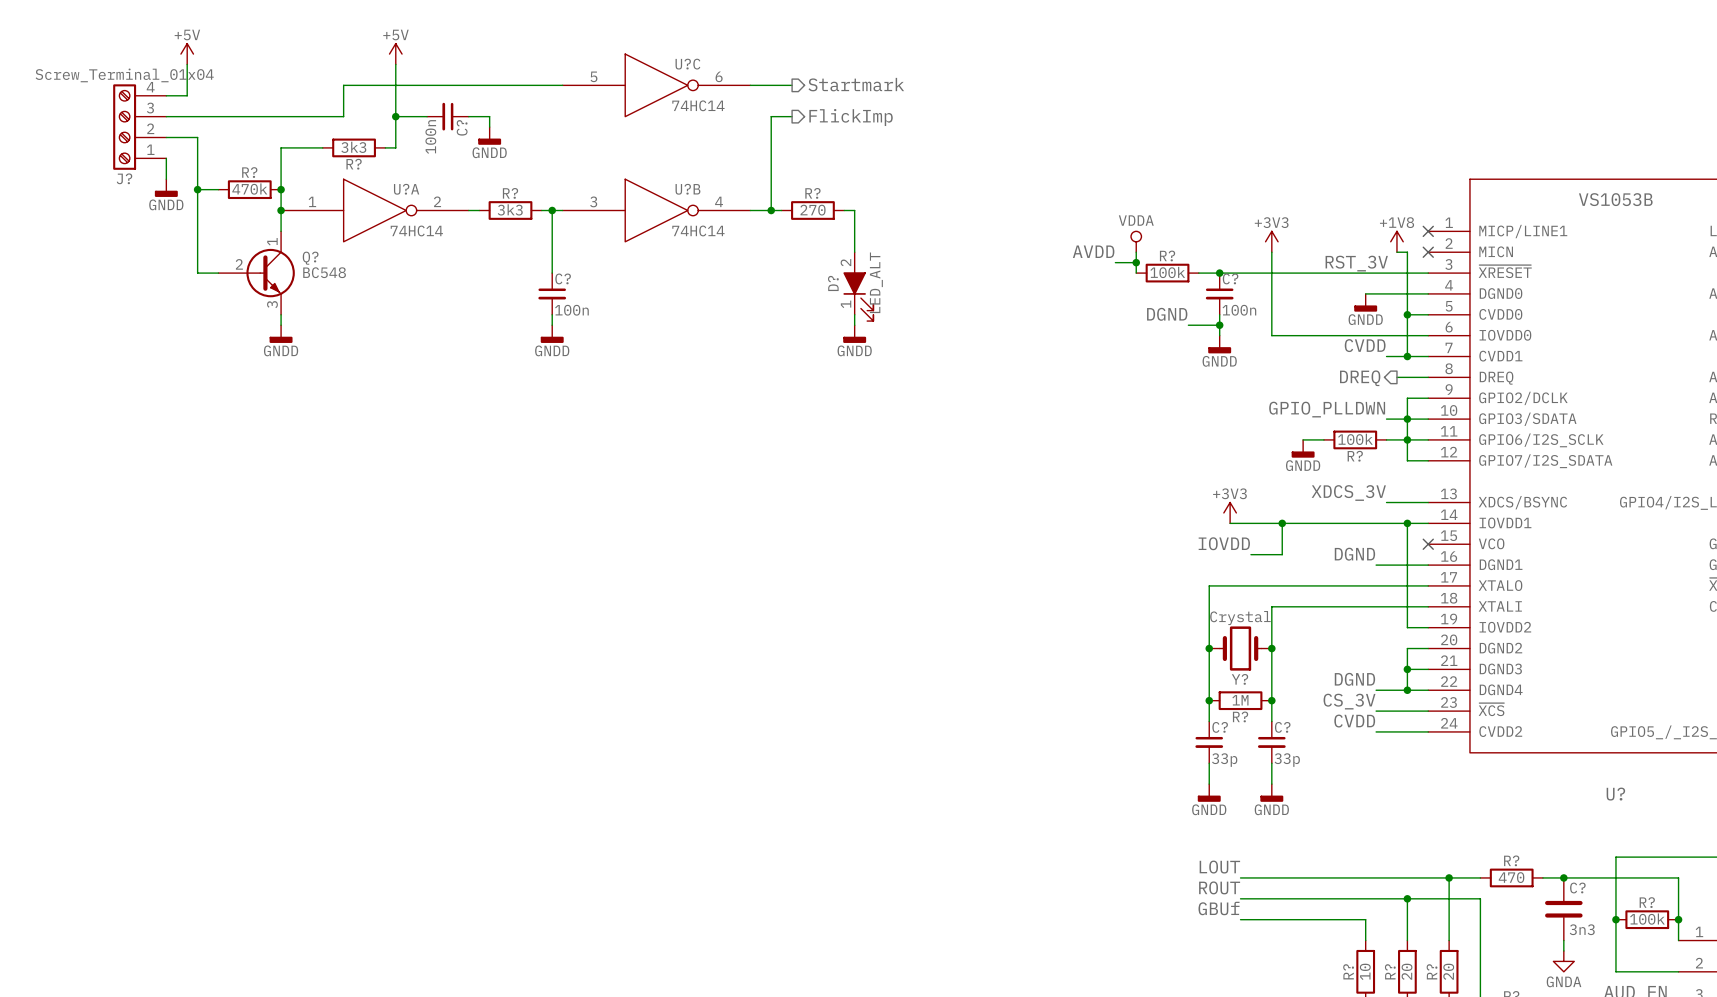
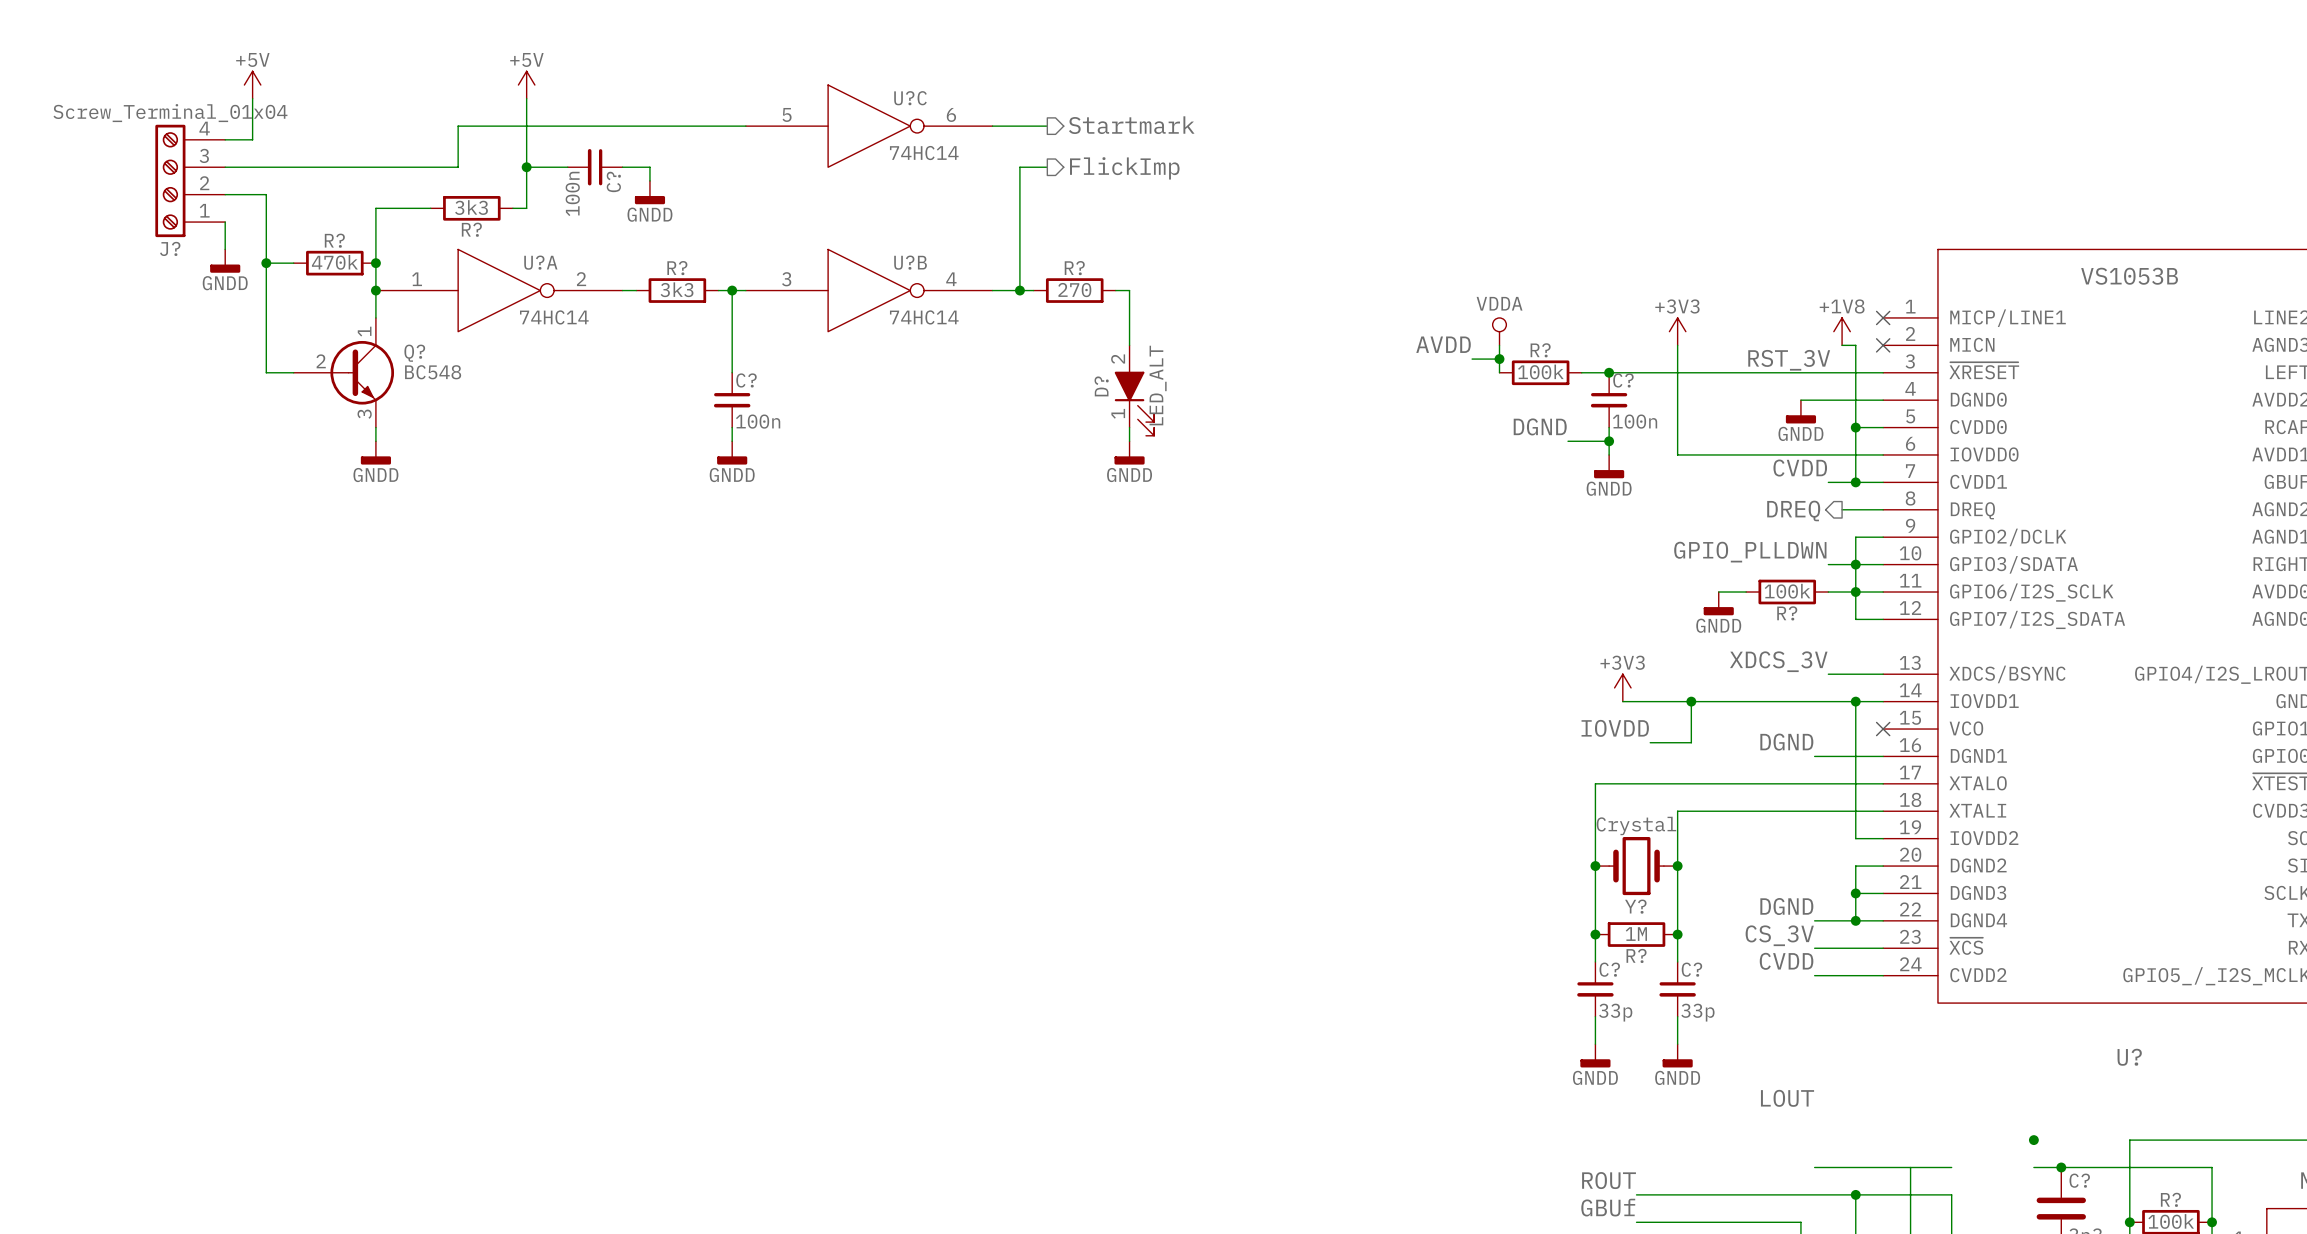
junction: none -> (2033, 1140)
label position: LOUT (1219, 867) -> LOUT (1787, 1098)
wire: (1240, 877) (1376, 877) -> none
junction: (1449, 877) -> none
R?: 470 (1511, 877) -> none

